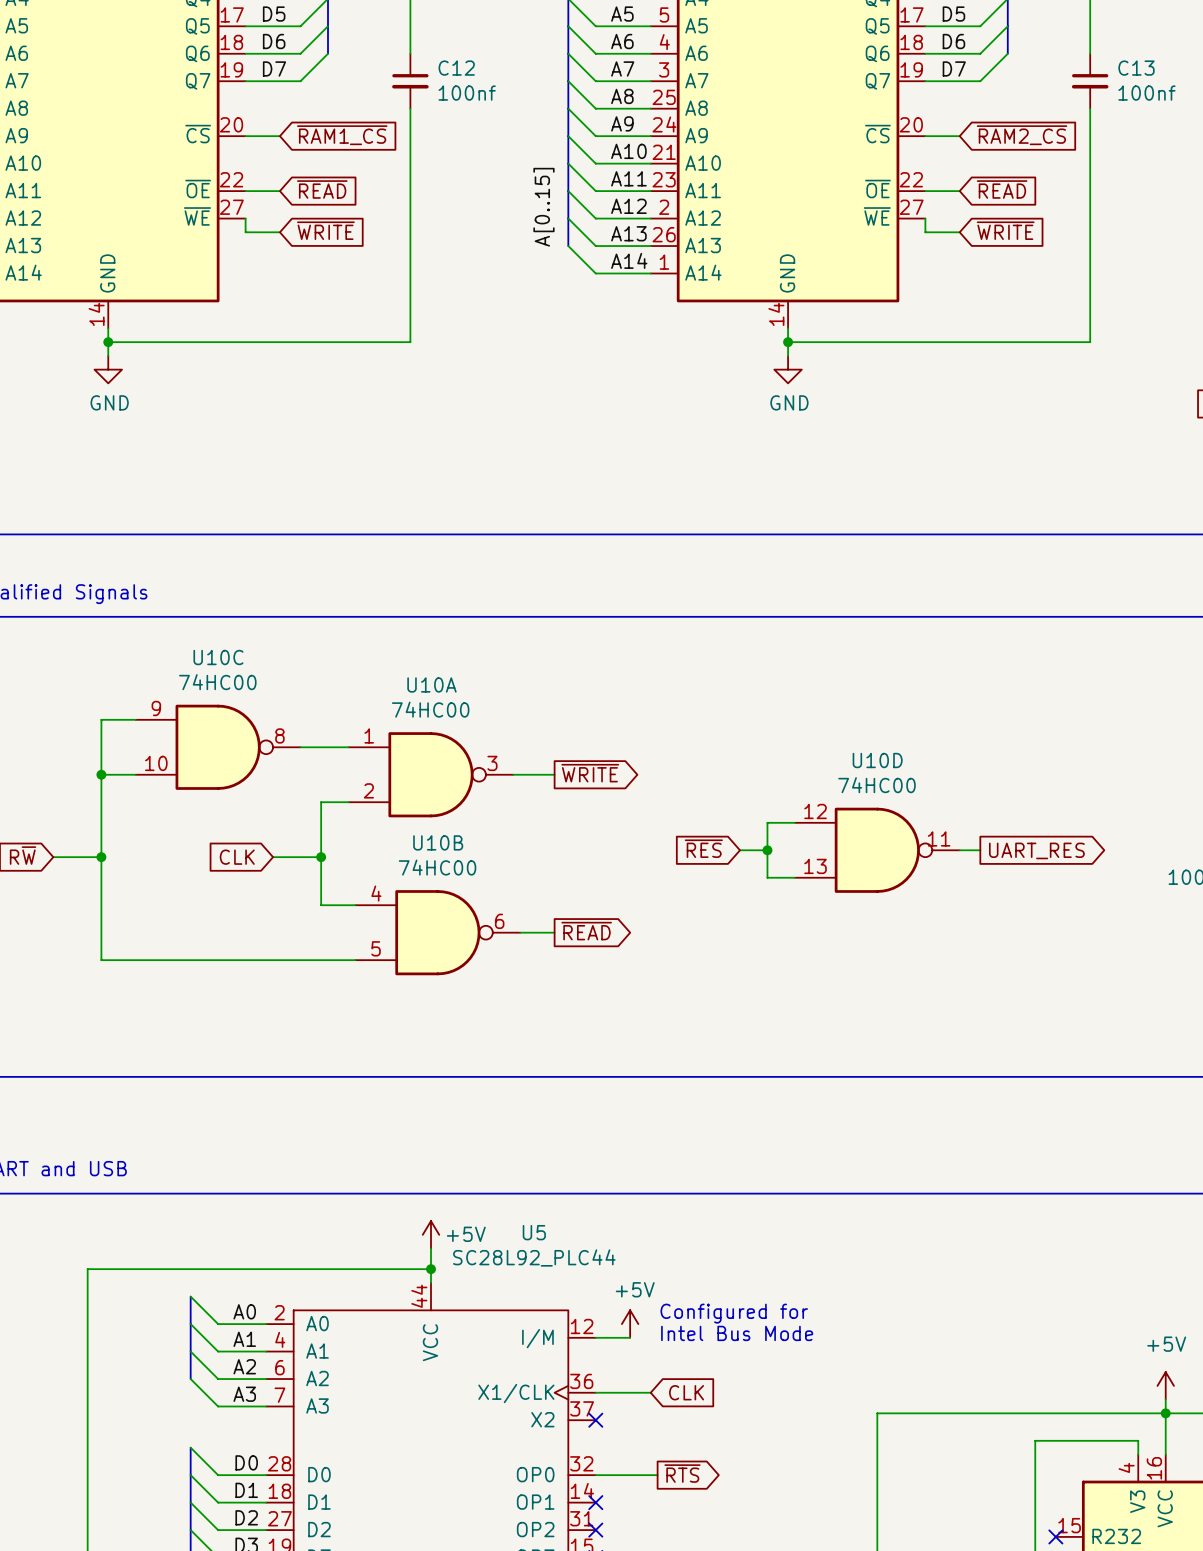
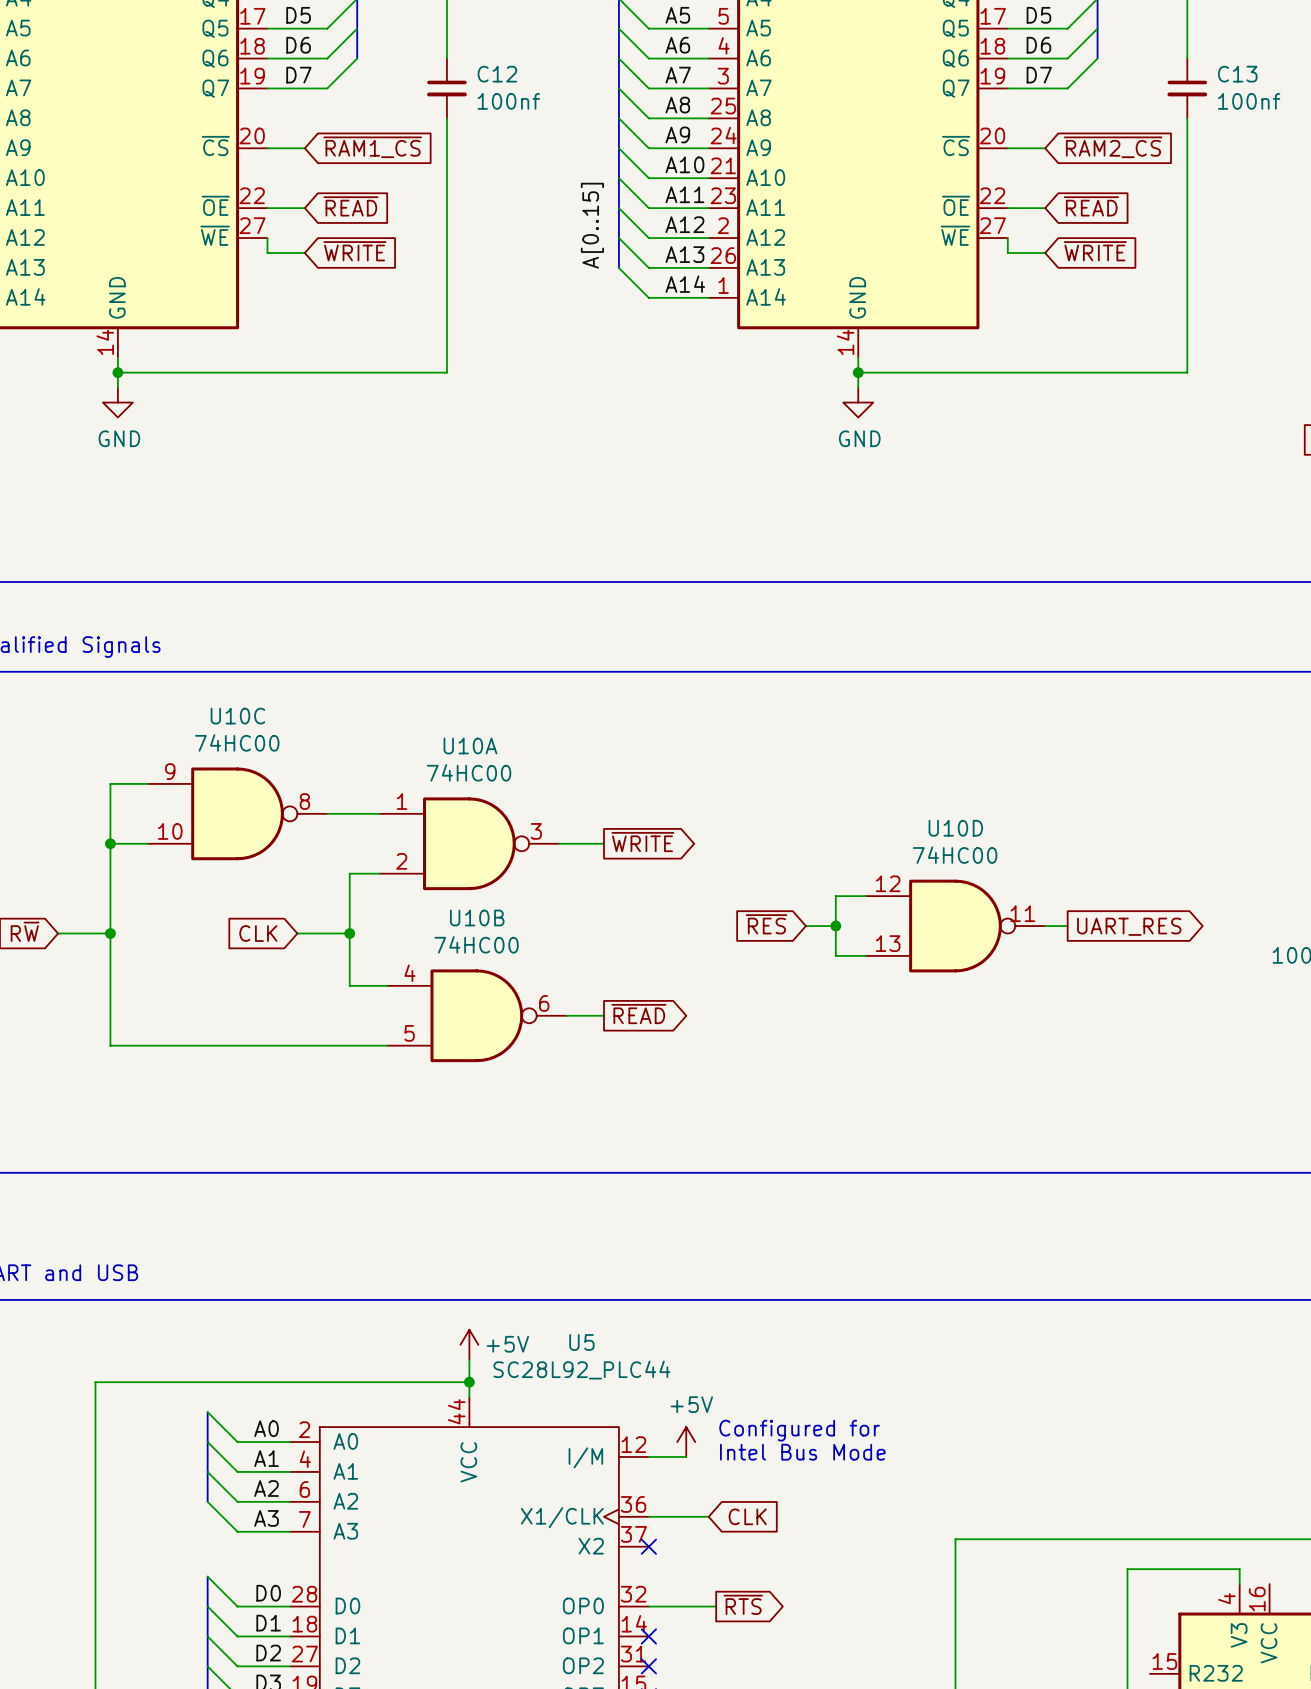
power symbol: +5V (1165, 1385) -> none
wire: (1165, 1399) (1165, 1454) -> none
junction: (1165, 1413) -> none
no-connect mark: (1055, 1536) -> none

